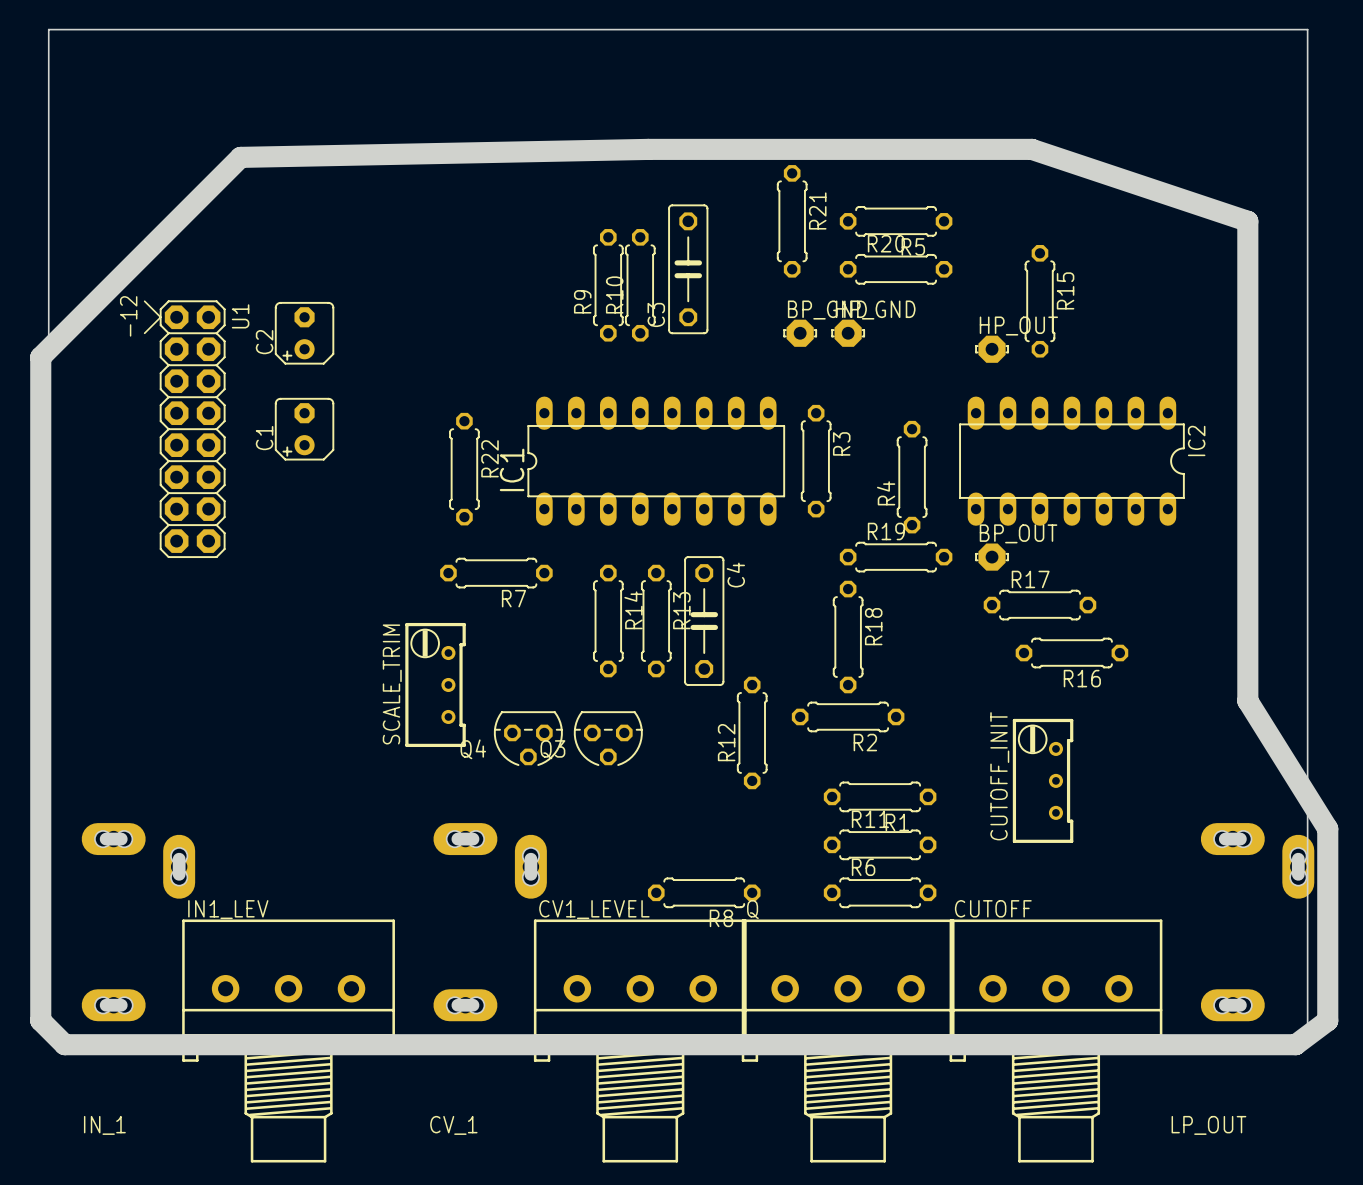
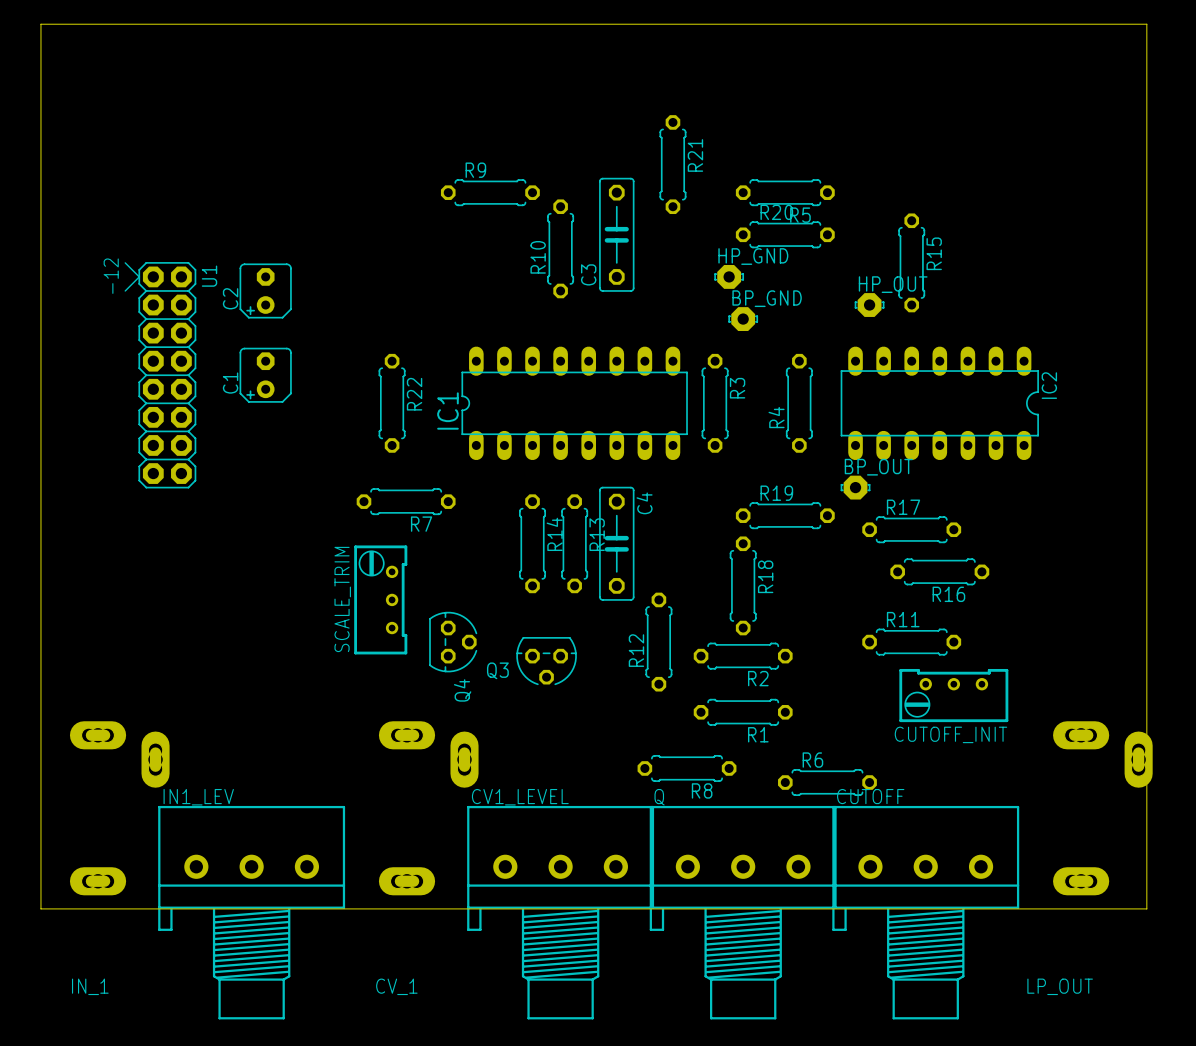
board edge: (648, 149) (1031, 149) (1247, 221) (1247, 700) (1327, 828) (1327, 1020) (1295, 1044) (64, 1044) (40, 1020) (40, 357) (240, 157) (648, 149) -> none
R21 position: (792, 221) -> (672, 164)
C3 position: (688, 269) -> (616, 234)
R9 rotation: 0° (608, 285) -> 90° clockwise (490, 192)
R9 position: (608, 285) -> (490, 192)
BP_GND position: (800, 333) -> (743, 319)
HP_GND position: (848, 333) -> (729, 276)
R22 position: (464, 469) -> (392, 403)
R4 position: (912, 477) -> (799, 403)
R19 position: (896, 557) -> (785, 515)
BP_OUT position: (992, 557) -> (855, 487)
R7 position: (496, 573) -> (406, 501)
R18 position: (848, 637) -> (743, 585)
R2 position: (848, 716) -> (743, 656)
Q4 rotation: 0° (528, 738) -> 90° counterclockwise (453, 642)
Q3 position: (608, 738) -> (546, 661)
CUTOFF_INIT rotation: 0° (1043, 780) -> 90° counterclockwise (953, 695)
R1 position: (880, 796) -> (743, 712)
R11 position: (880, 844) -> (911, 642)
R8 position: (704, 892) -> (687, 768)
R6 position: (880, 892) -> (827, 782)

